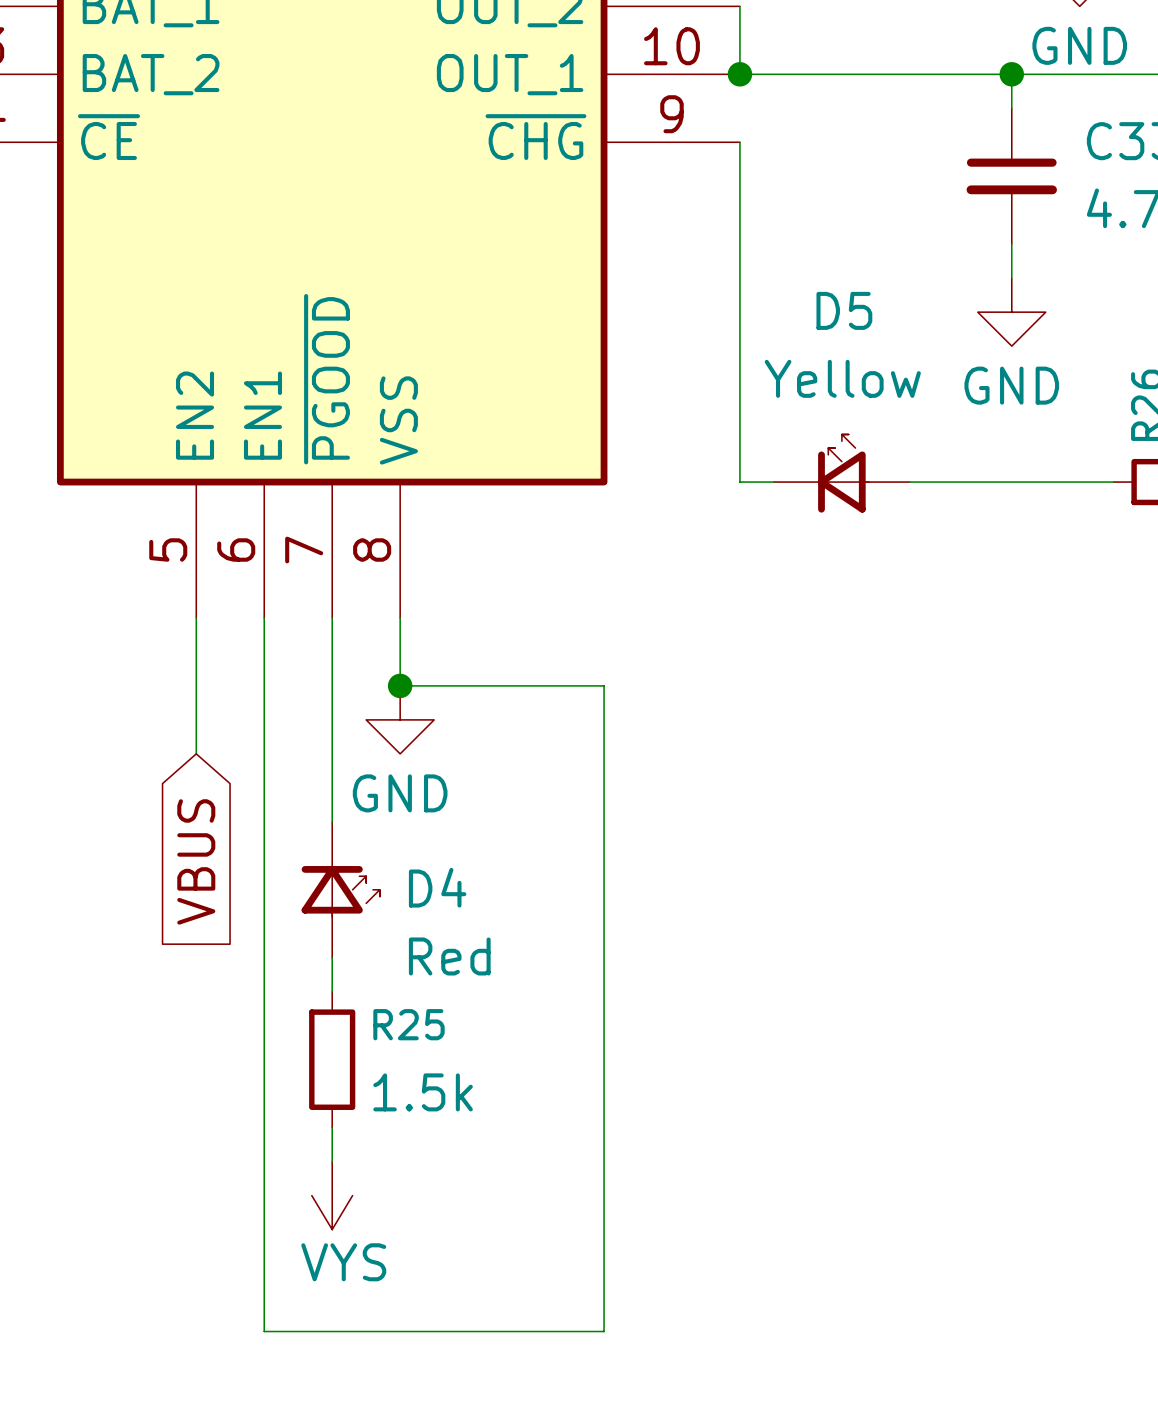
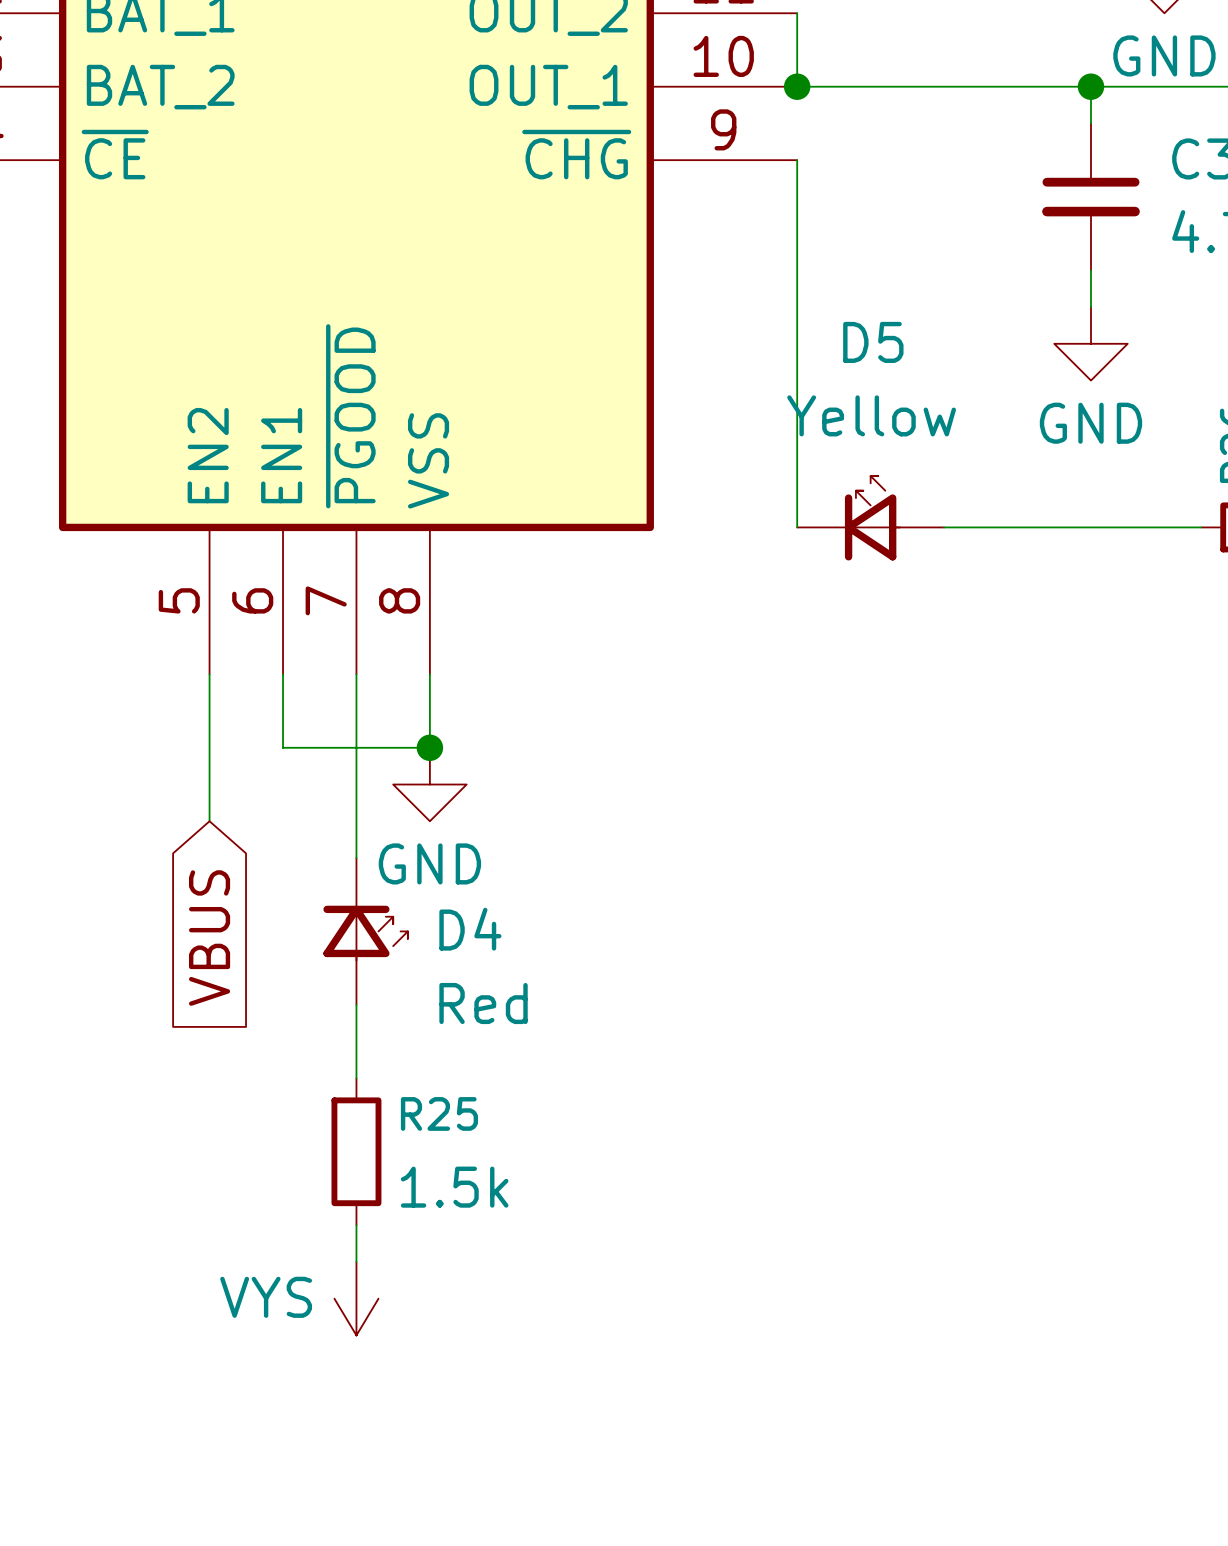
D5 position: (841, 473) -> (870, 518)
wire: (264, 685) (264, 1331) (604, 1331) (604, 685) (400, 685) -> (283, 747) (429, 747)
D4 position: (340, 889) -> (365, 931)
power symbol text position: VYS (343, 1262) -> VYS (266, 1297)

